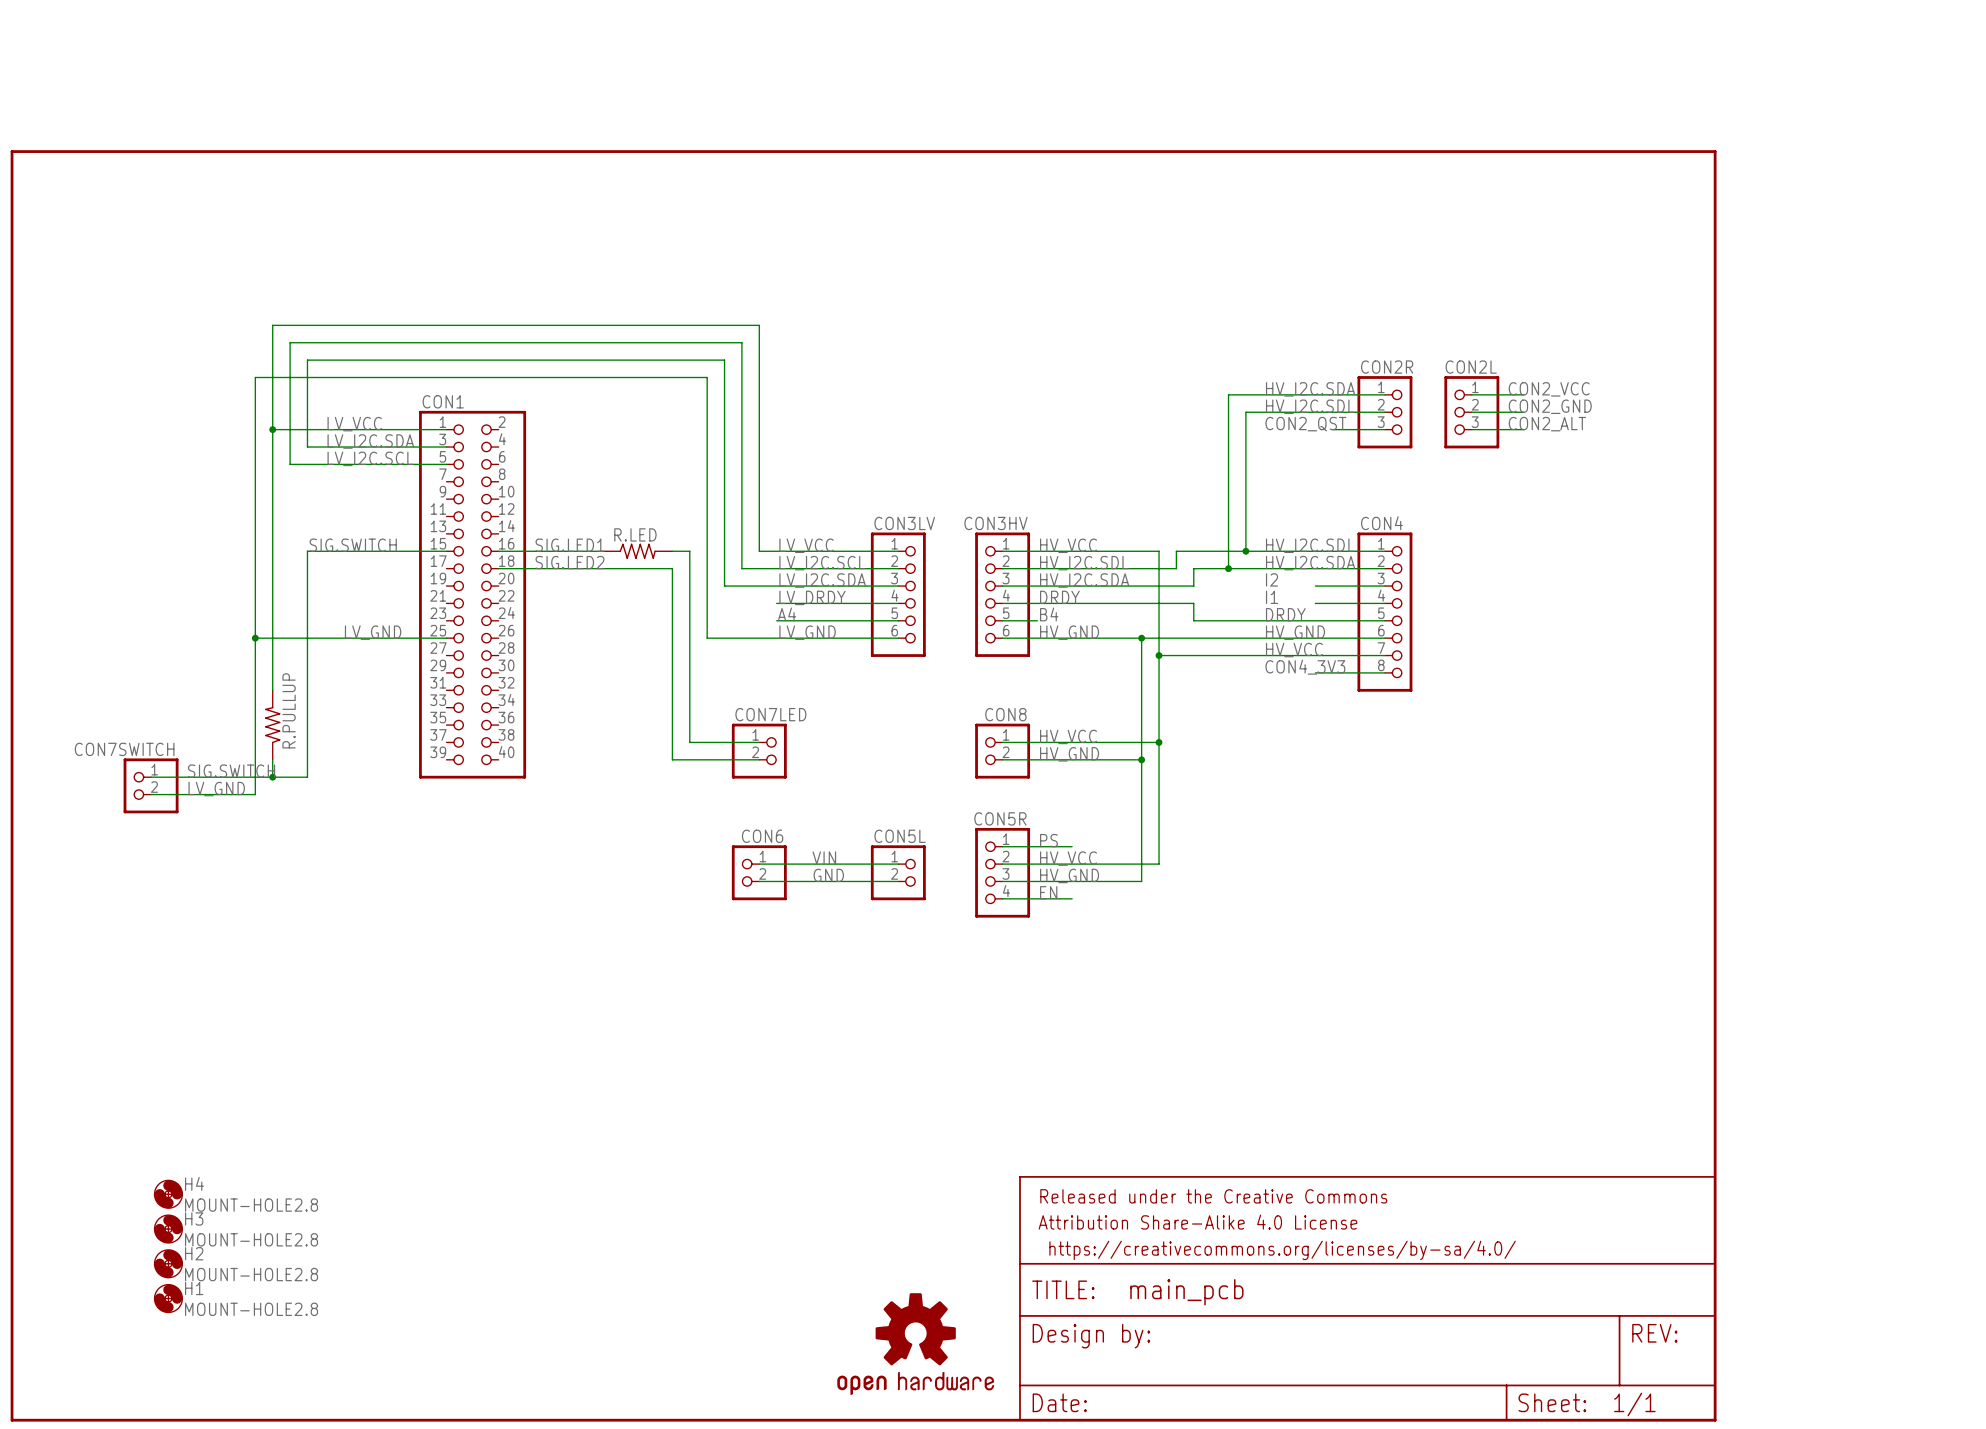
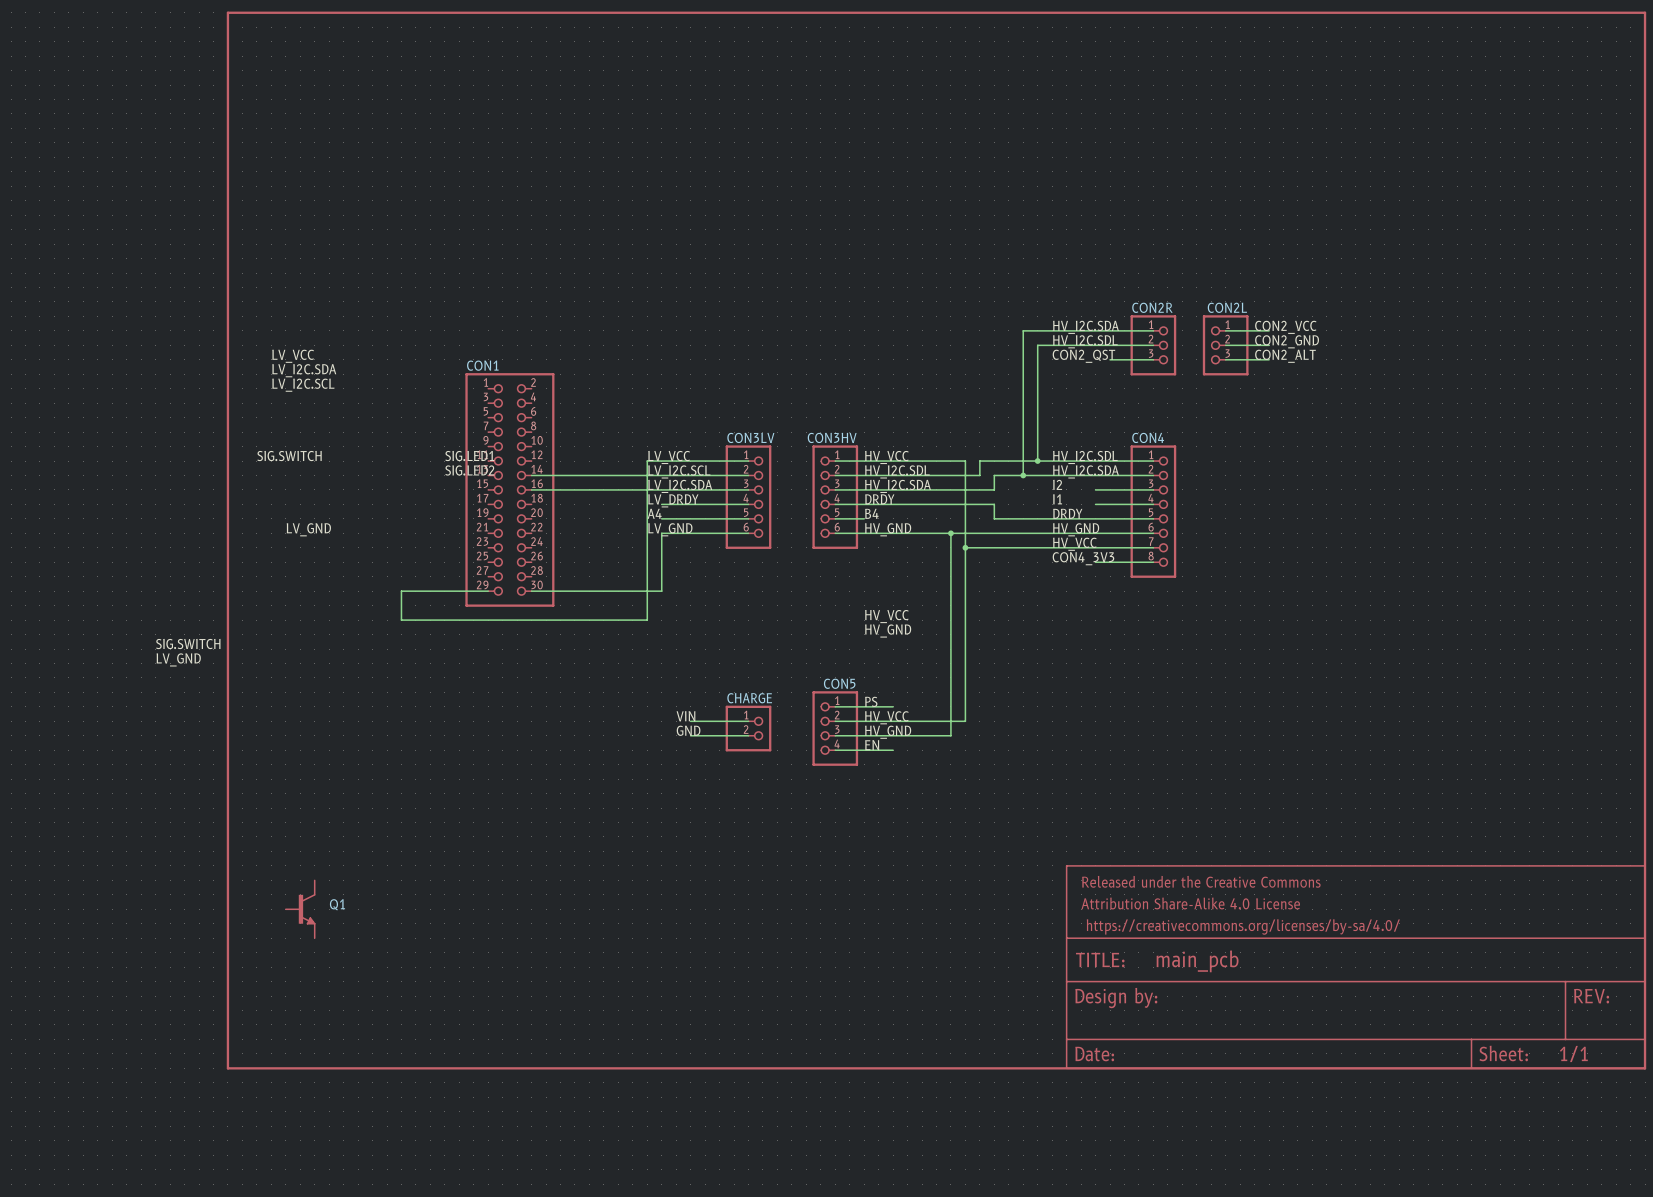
CON1 name position: CON1 (443, 401) -> CON1 (482, 365)
CON1 symbol: [419, 410, 527, 779] -> [465, 373, 555, 607]
wire: (272, 429) (446, 429) -> none
junction: (272, 429) -> none
wire: (446, 447) (307, 447) (307, 360) (724, 360) (724, 586) -> (531, 489) (603, 489)
wire: (446, 464) (290, 464) (290, 342) (741, 342) (741, 568) -> none
wire: (446, 551) (307, 551) (307, 777) (151, 777) -> none
wire: (498, 551) (602, 551) -> none
R.LED: (637, 551) -> none
wire: (672, 551) (689, 551) (689, 742) -> (488, 591) (401, 591) (401, 620) (574, 620)
wire: (776, 551) (759, 551) (759, 325) (272, 325) (272, 690) -> (647, 461) (647, 620) (632, 620)
wire: (498, 568) (637, 568) -> none
wire: (672, 568) (672, 759) (759, 759) -> (560, 475) (618, 475)
wire: (776, 603) (794, 603) -> none
wire: (776, 620) (794, 620) -> none
wire: (255, 638) (446, 638) -> none
junction: (255, 638) -> none
wire: (794, 638) (707, 638) (707, 377) (255, 377) (255, 794) (151, 794) -> (661, 533) (661, 591) (531, 591)
part: none -> (936, 540)
R.PULLUP: (272, 725) -> none
wire: (1002, 742) (1159, 742) -> none
junction: (1159, 742) -> none
CON7LED: (759, 751) -> none
CON8: (1002, 751) -> none
wire: (1002, 759) (1141, 759) -> none
junction: (1141, 759) -> none
junction: (272, 777) -> none
CON7SWITCH: (151, 785) -> none
part: (863, 785) -> none
CON5R name: CON5R (1000, 818) -> CON5 (839, 683)
CON5L name: CON5L (900, 836) -> CHARGE (749, 698)
wire: (759, 864) (828, 864) -> none
CON6: (759, 872) -> none
wire: (759, 881) (828, 881) -> none
Q1: none -> (300, 909)
part: none -> (1355, 967)
H4: MOUNT-HOLE2.8 (168, 1194) -> none
H3: MOUNT-HOLE2.8 (168, 1229) -> none
H2: MOUNT-HOLE2.8 (168, 1263) -> none
H1: MOUNT-HOLE2.8 (168, 1298) -> none
part: (1367, 1298) -> none
part: (915, 1344) -> none

